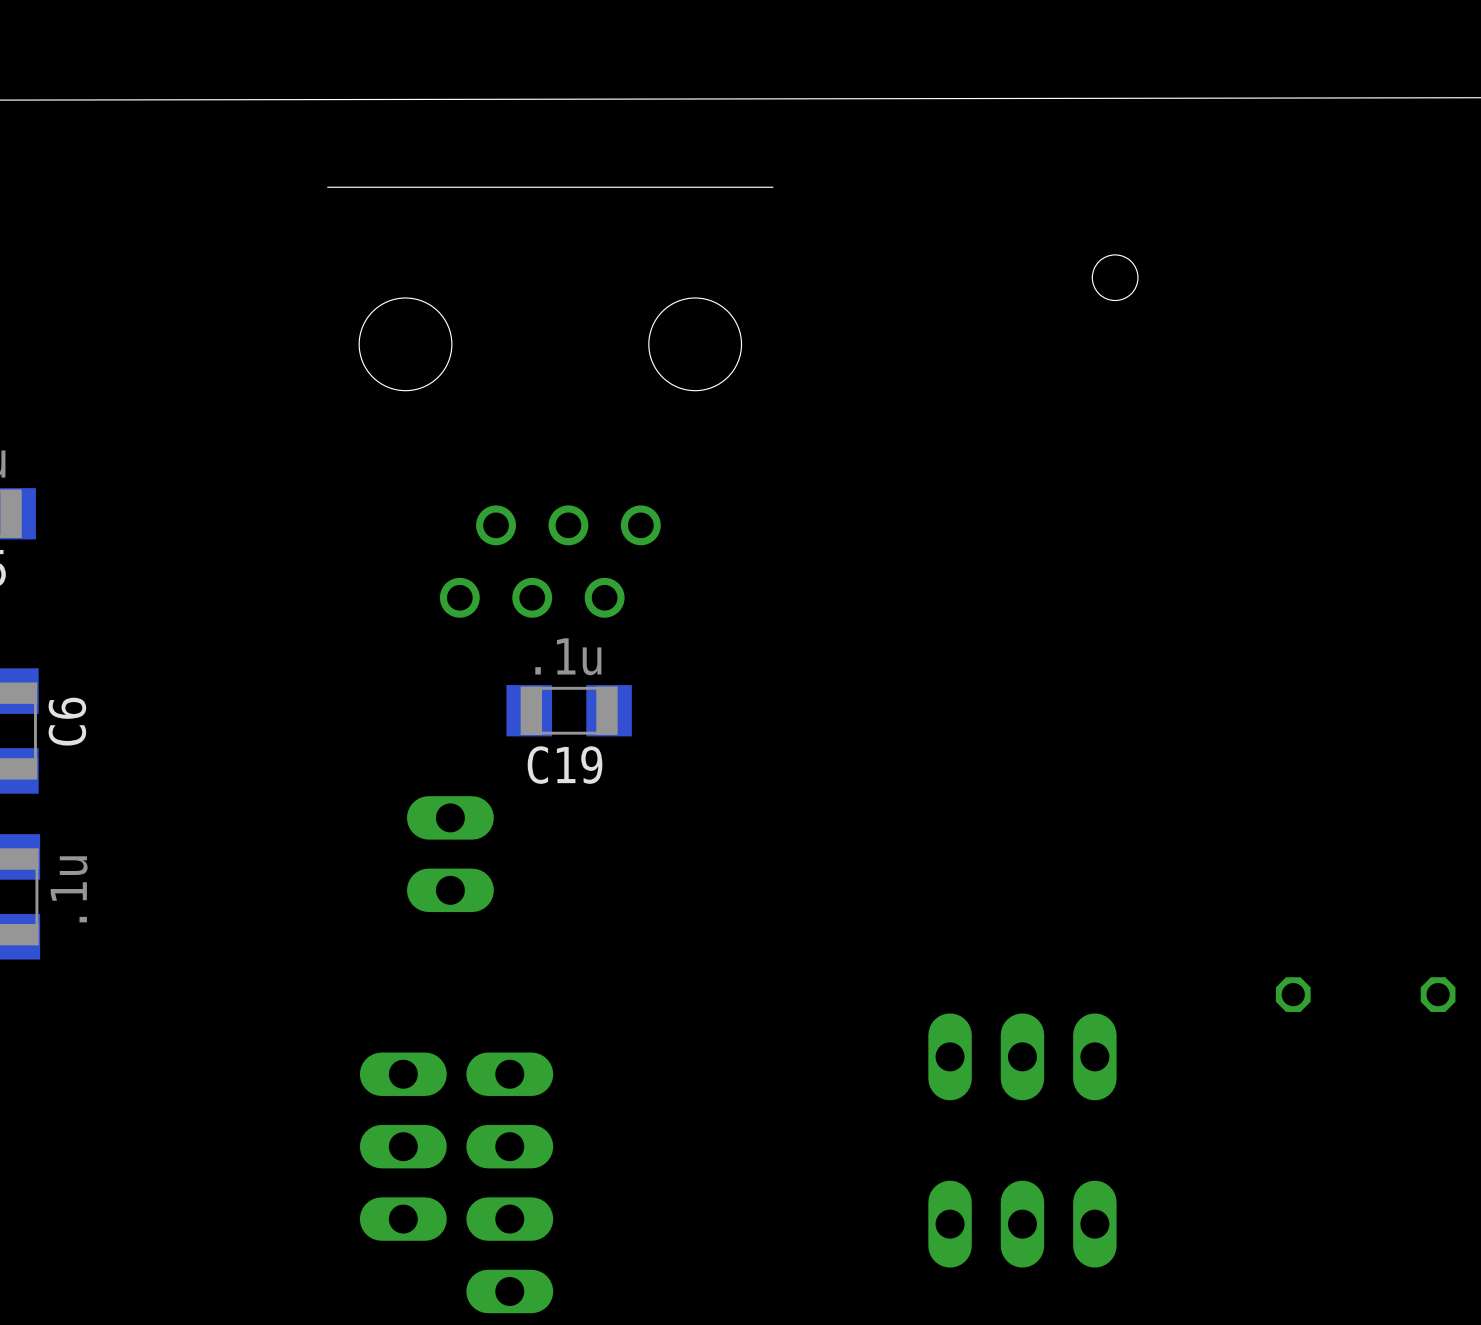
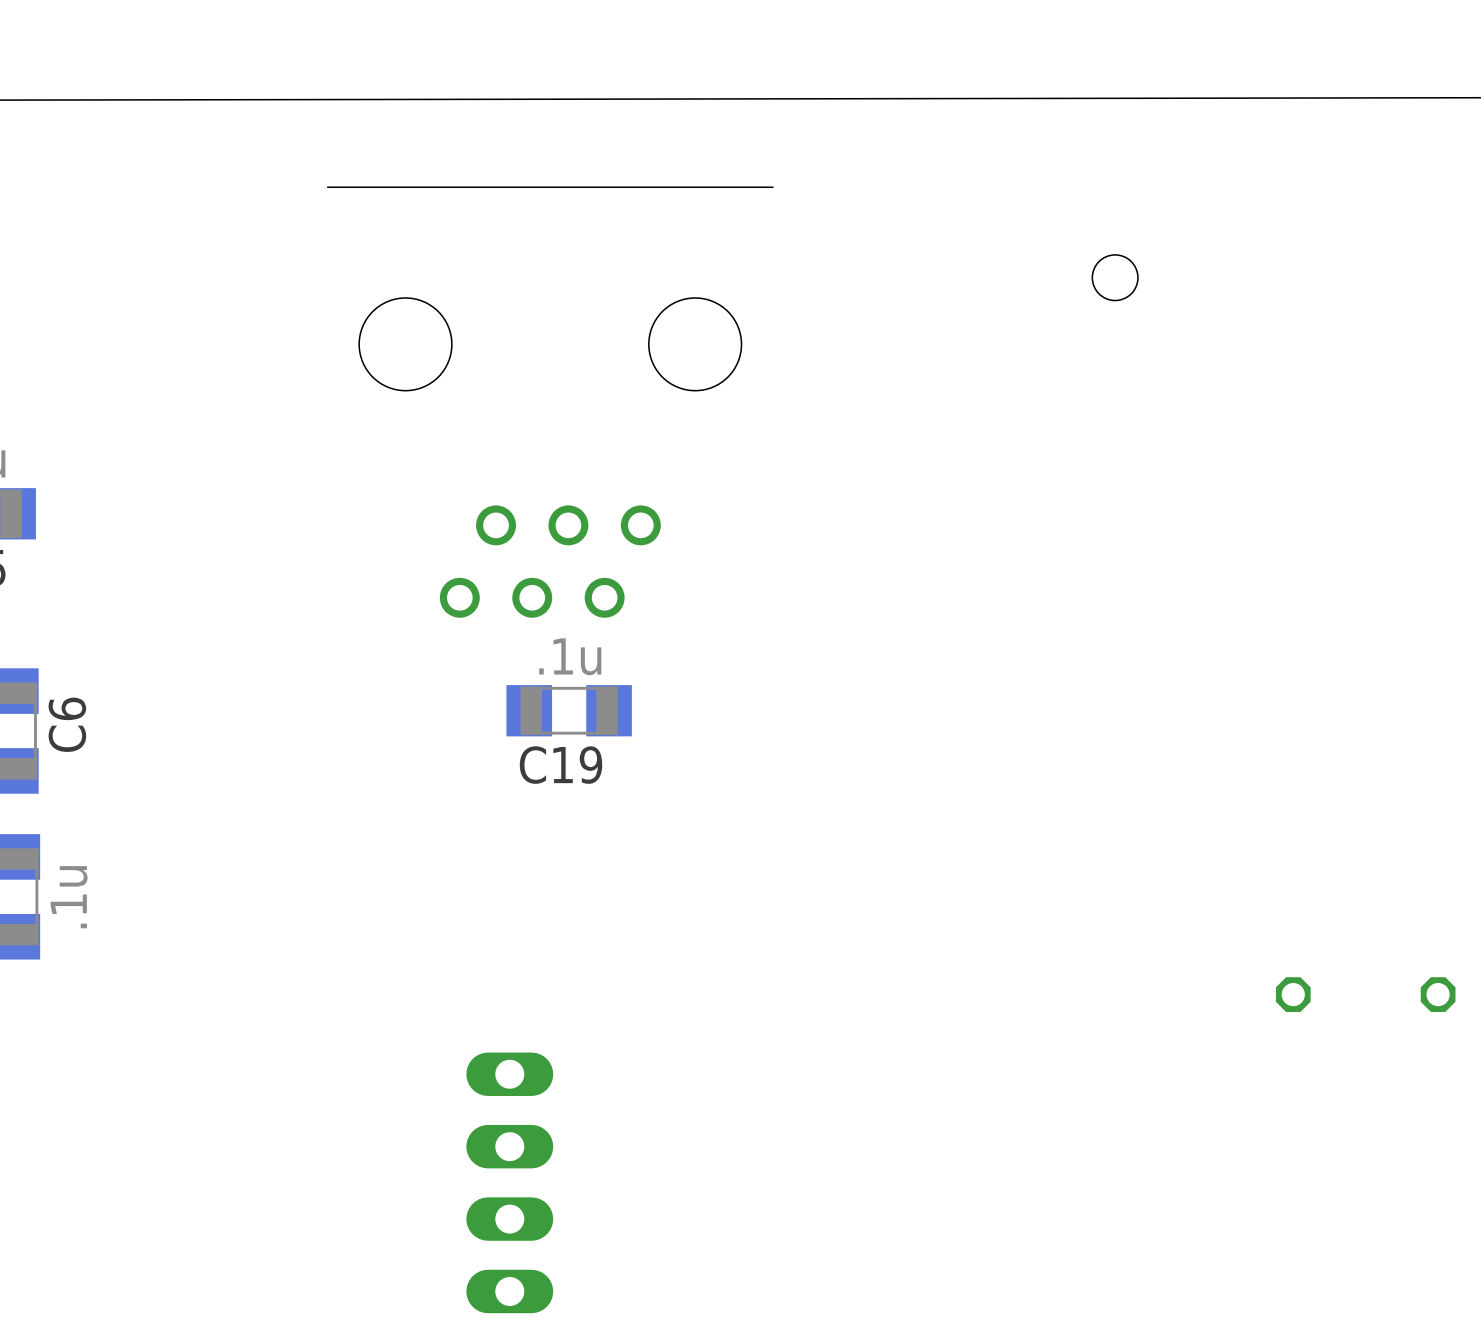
part: (450, 854) -> none
part: (1022, 1056) -> none
part: (403, 1146) -> none
part: (1022, 1224) -> none

